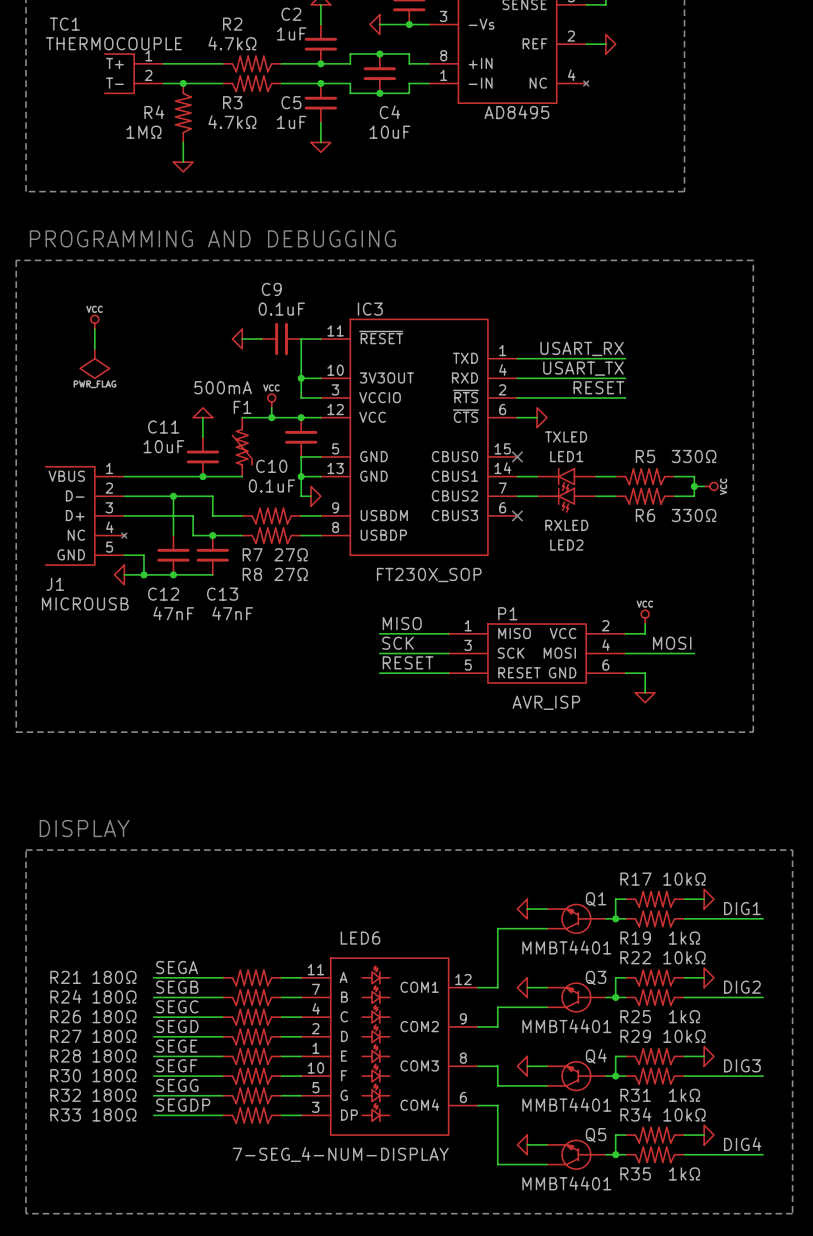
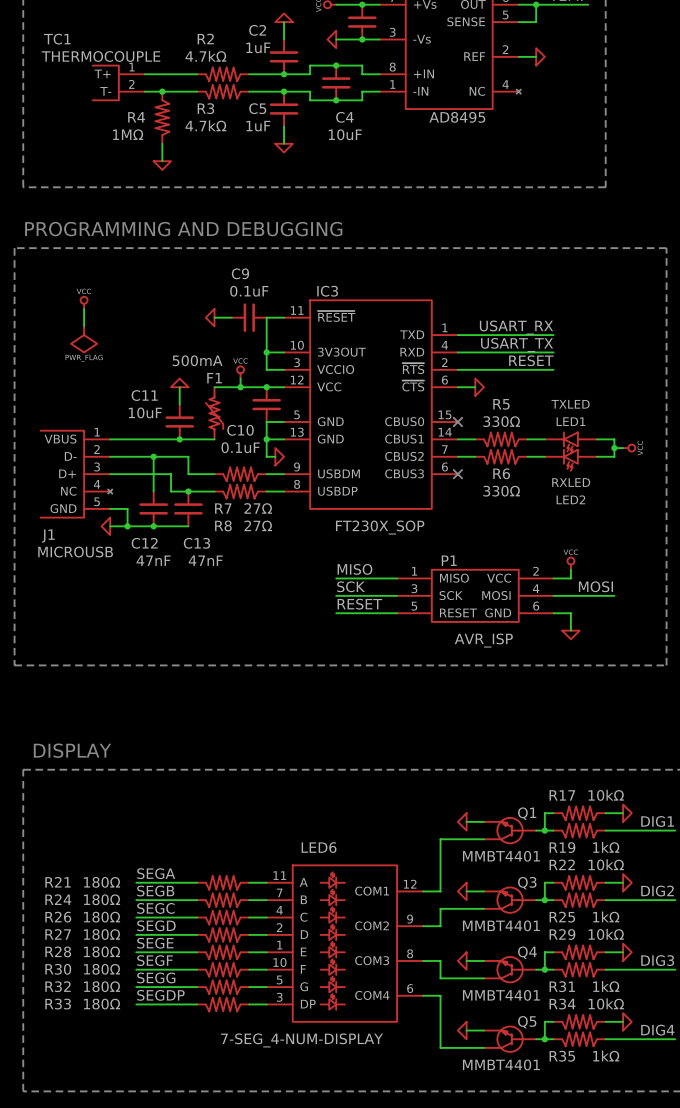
R5 name position: R5 (645, 456) -> R5 (501, 404)
R5 value position: 330Ω (694, 456) -> 330Ω (501, 421)
R5 position: (645, 476) -> (501, 439)
LED1 position: (566, 480) -> (570, 442)
R6 position: (645, 496) -> (501, 456)
LED2 position: (566, 500) -> (570, 460)
R6 value position: 330Ω (694, 515) -> 330Ω (501, 491)

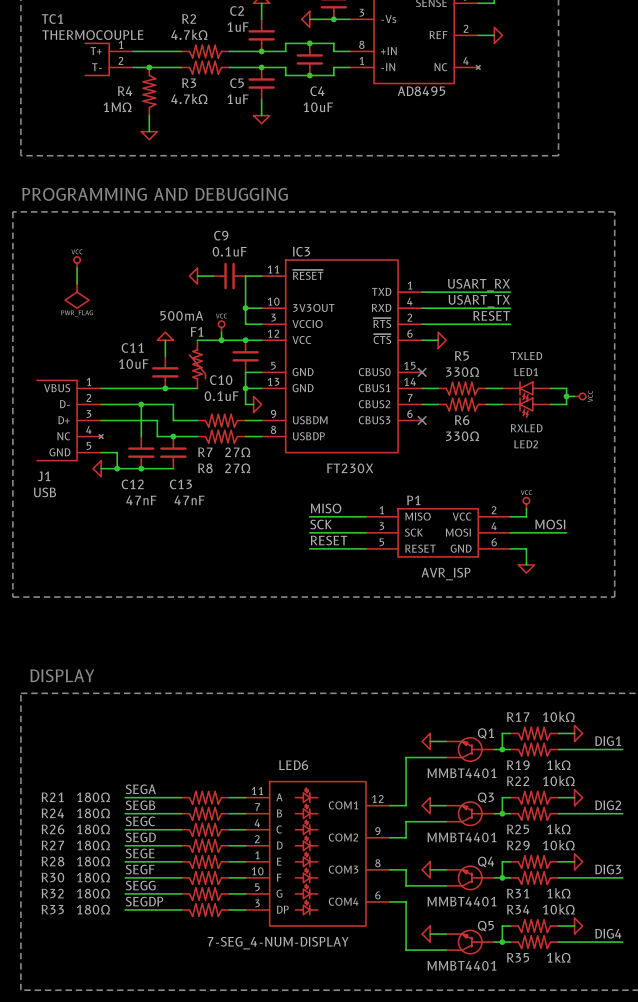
IC3 value: FT230X_SOP (380, 527) -> FT230X (350, 468)
J1 value: MICROUSB (75, 552) -> USB (44, 492)

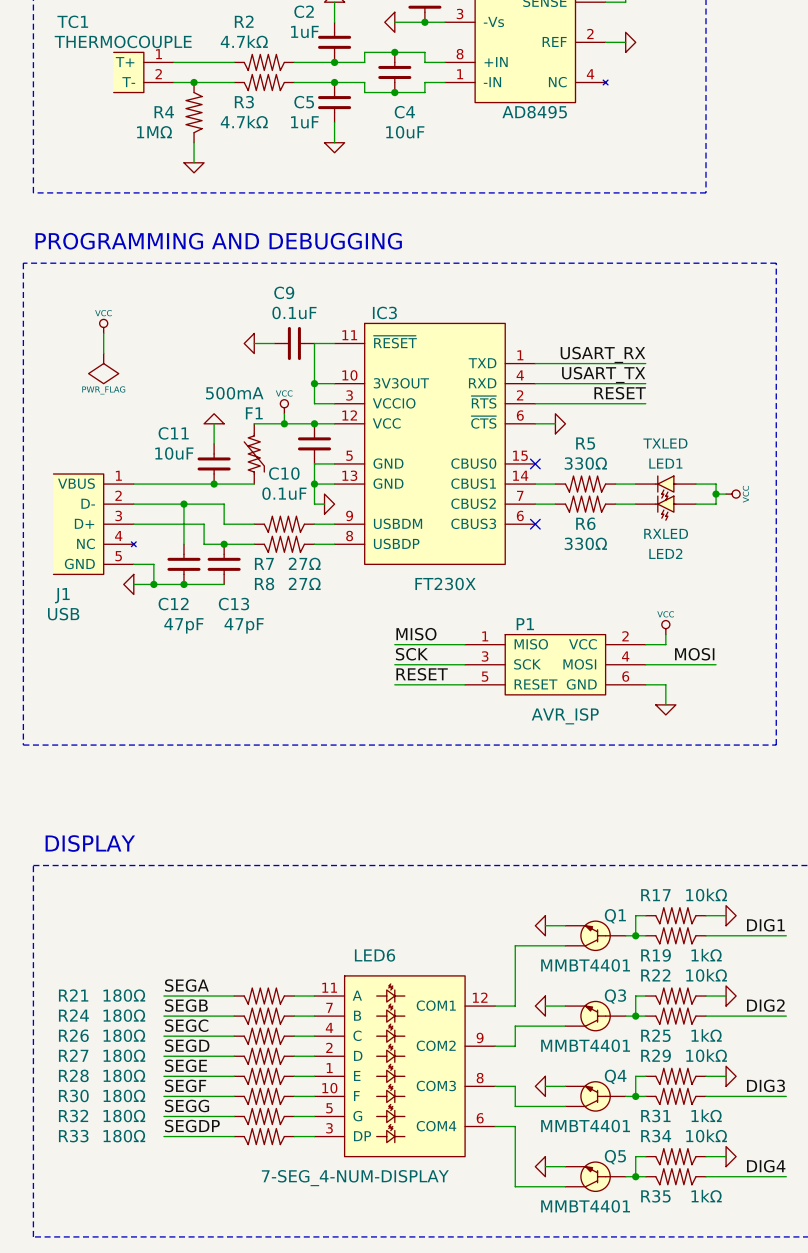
C12 value: 47nF (141, 500) -> 47pF (183, 625)
C13 value: 47nF (189, 500) -> 47pF (244, 625)

